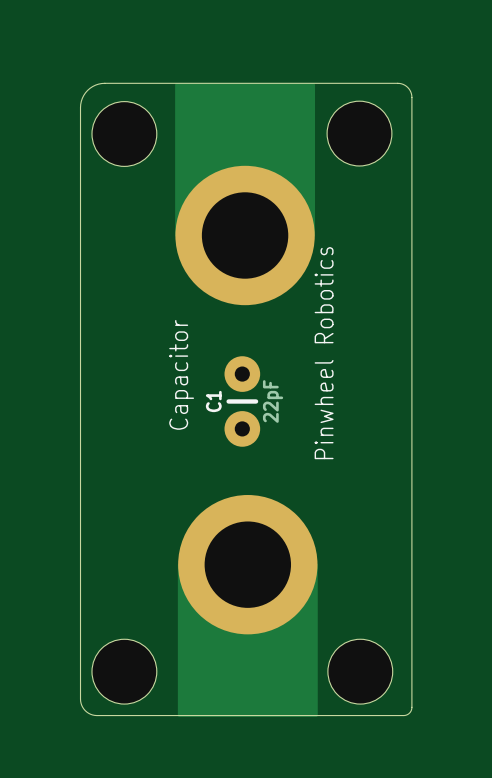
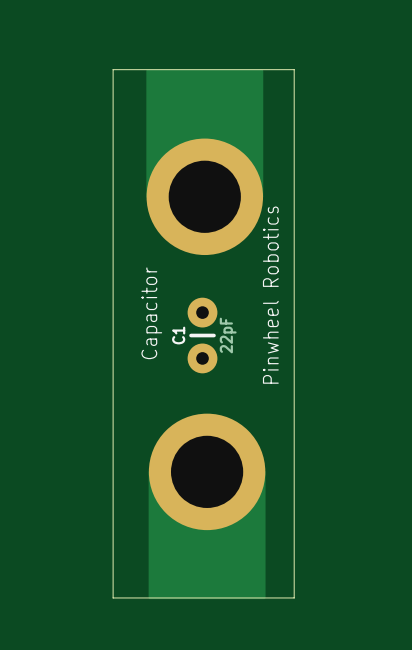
board edge: (135, 83) (95, 85) (85, 92) (80, 107) (80, 701) (83, 709) (92, 714) (135, 715) -> (113, 69) (113, 597)
board edge: (352, 83) (401, 83) (408, 88) (411, 97) (411, 708) (409, 713) (404, 715) (352, 715) -> (294, 69) (294, 597)
hole: (124, 133) -> none
hole: (359, 133) -> none
hole: (124, 671) -> none
hole: (360, 671) -> none

